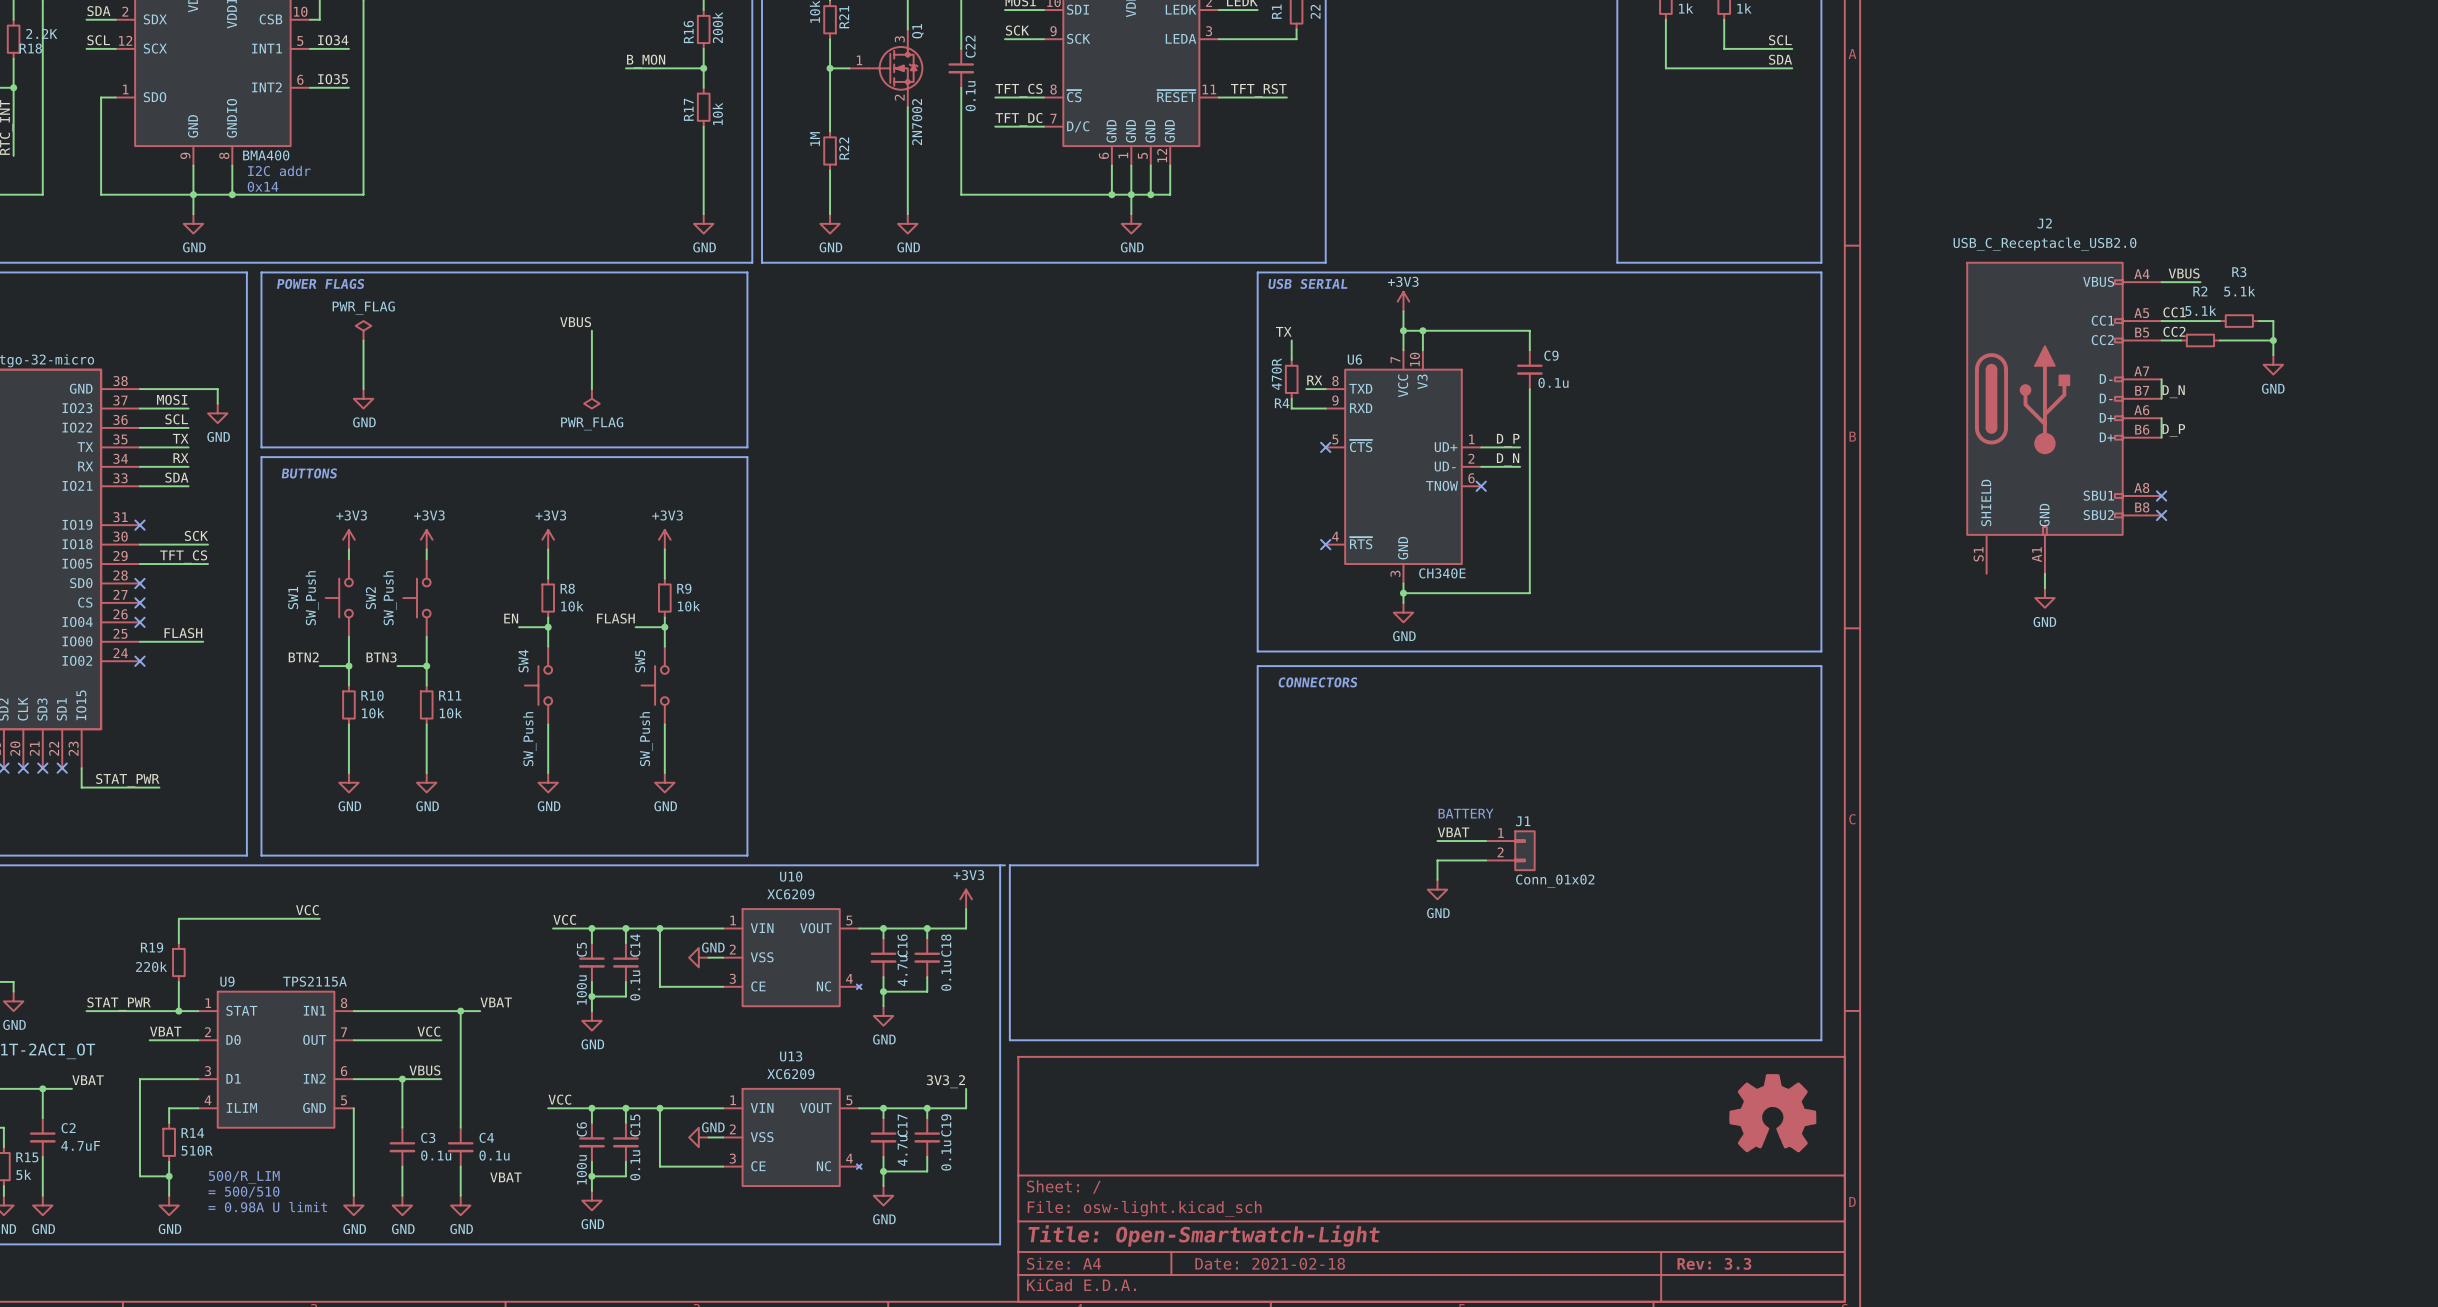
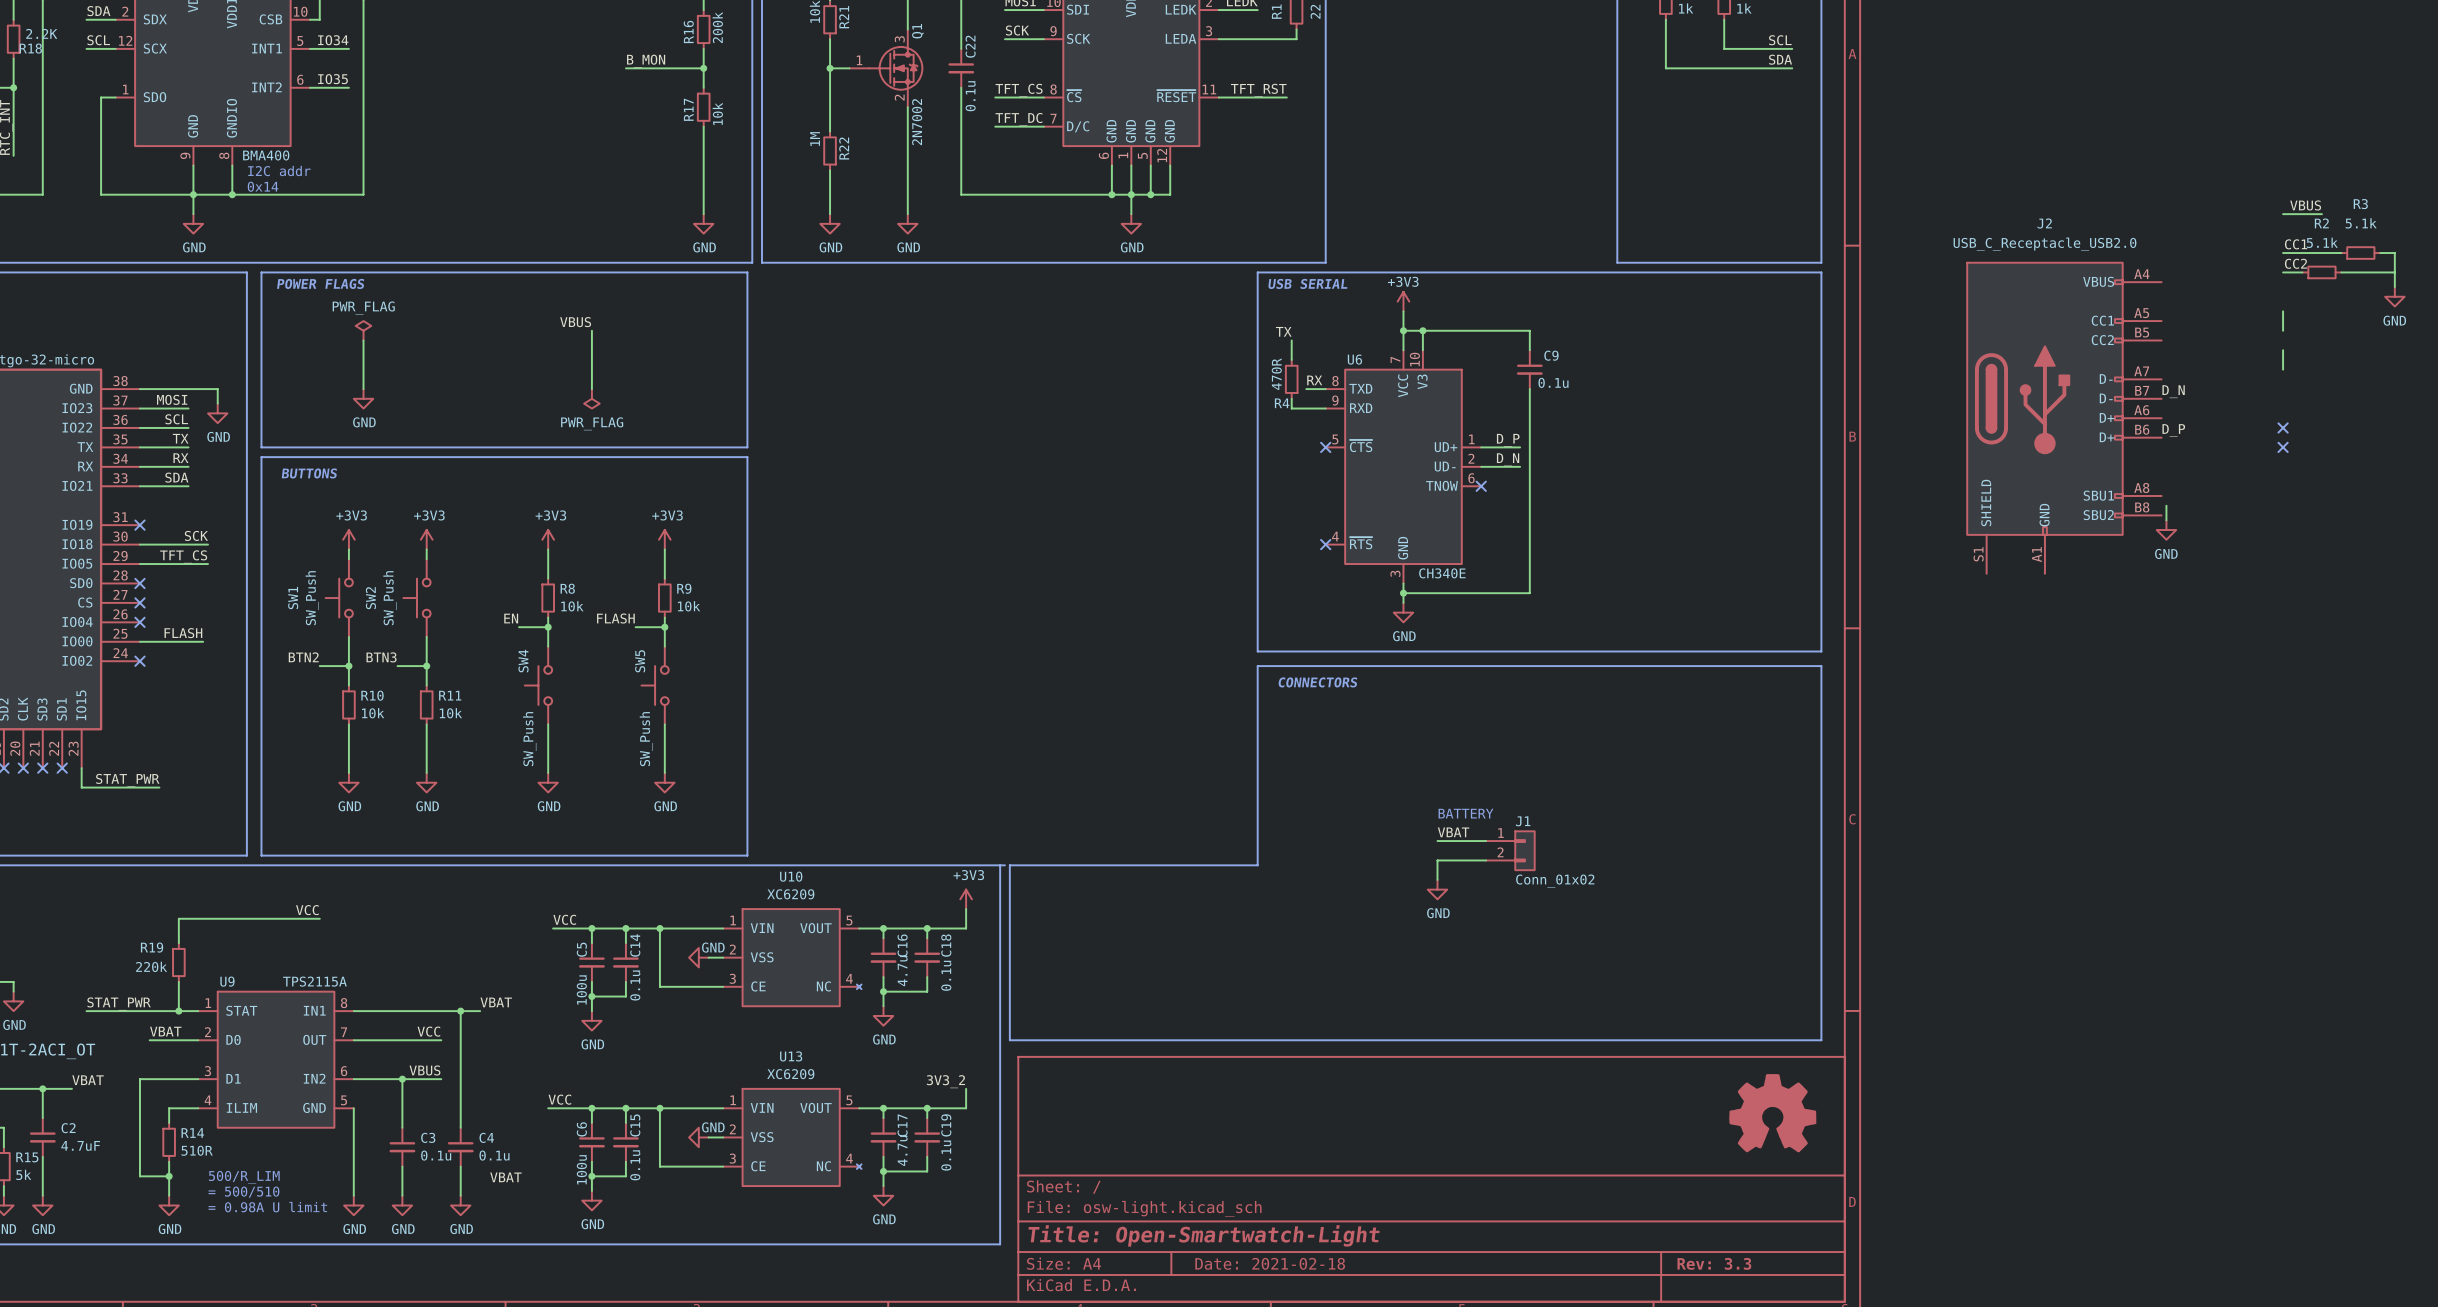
label position: VBUS (2184, 273) -> VBUS (2305, 205)
wire: (2161, 282) (2200, 282) -> (2283, 214) (2321, 214)
power symbol: none -> GND (2394, 296)
label position: CC1 (2174, 312) -> CC1 (2296, 244)
wire: (2161, 321) (2219, 321) -> (2283, 253) (2341, 253)
R3 position: (2239, 321) -> (2360, 253)
wire: (2258, 321) (2273, 321) (2273, 355) -> (2380, 253) (2394, 253) (2394, 287)
label position: CC2 (2174, 331) -> CC2 (2295, 263)
wire: (2161, 340) (2181, 340) -> (2283, 272) (2302, 272)
R2 position: (2200, 340) -> (2321, 272)
wire: (2219, 340) (2273, 340) -> (2341, 272) (2394, 272)
junction: (2273, 340) -> none
power symbol: GND (2273, 364) -> none
wire: (2161, 379) (2161, 398) -> (2283, 311) (2283, 330)
wire: (2161, 418) (2161, 437) -> (2283, 350) (2283, 369)
no-connect mark: none -> (2283, 427)
no-connect mark: none -> (2283, 447)
no-connect mark: (2161, 495) -> none
no-connect mark: (2161, 515) -> none
power symbol: none -> GND (2166, 530)
wire: (2044, 573) (2044, 588) -> (2166, 505) (2166, 520)
power symbol: GND (2044, 598) -> none

